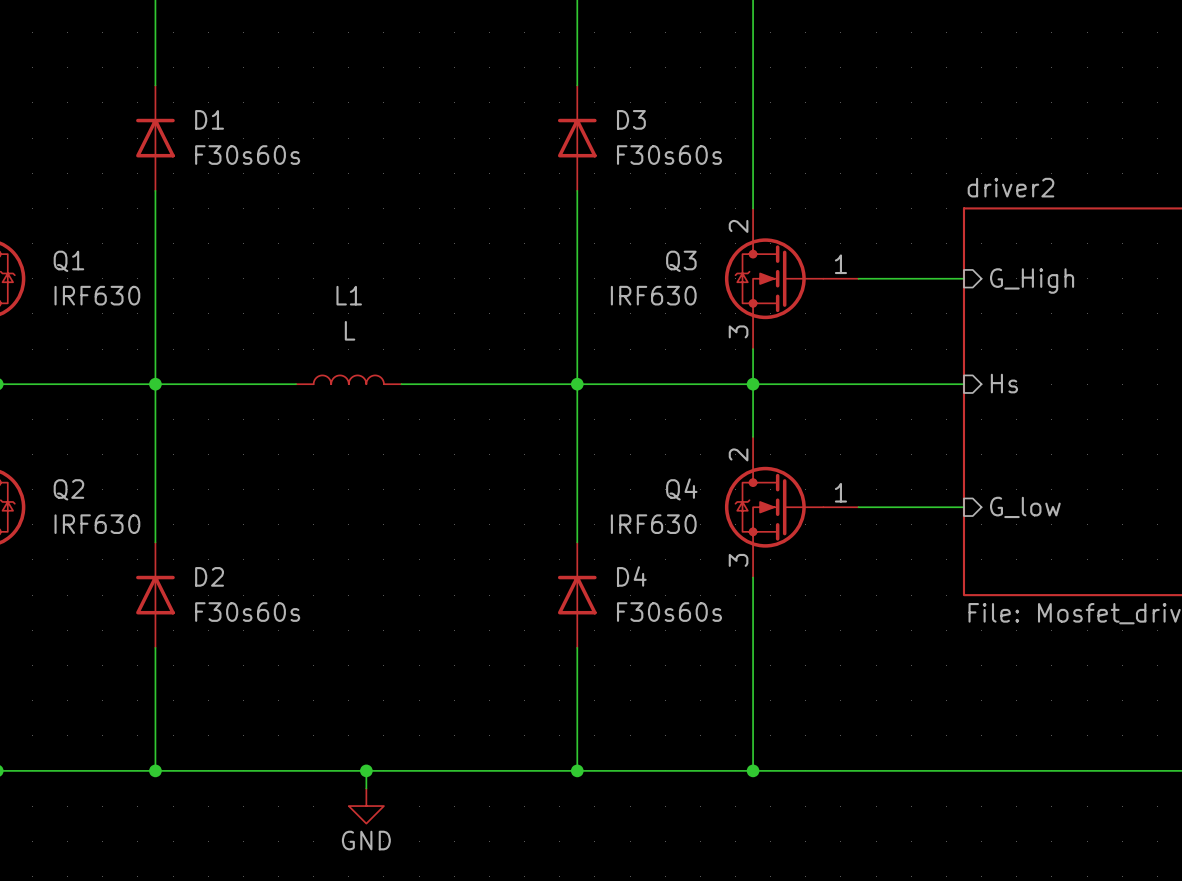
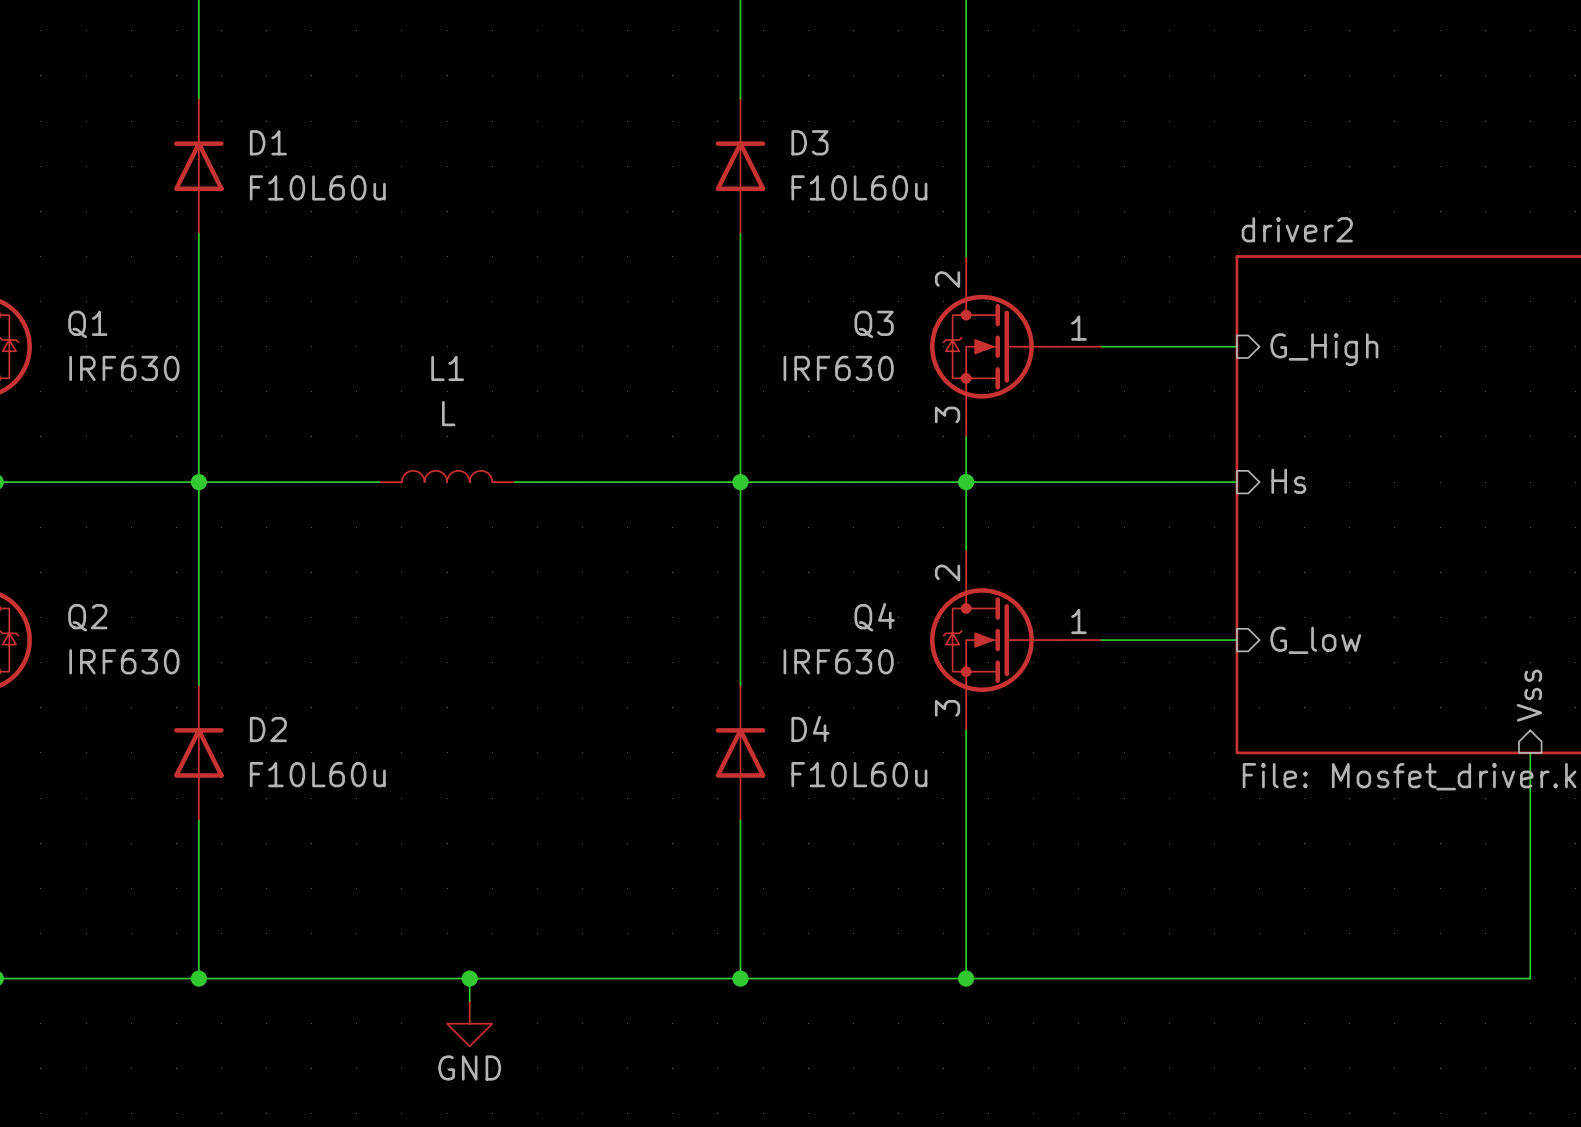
D1 value: F30s60s (247, 155) -> F10L60u (317, 187)
D3 value: F30s60s (669, 155) -> F10L60u (859, 187)
D2 value: F30s60s (247, 612) -> F10L60u (317, 774)
D4 value: F30s60s (669, 612) -> F10L60u (859, 774)

